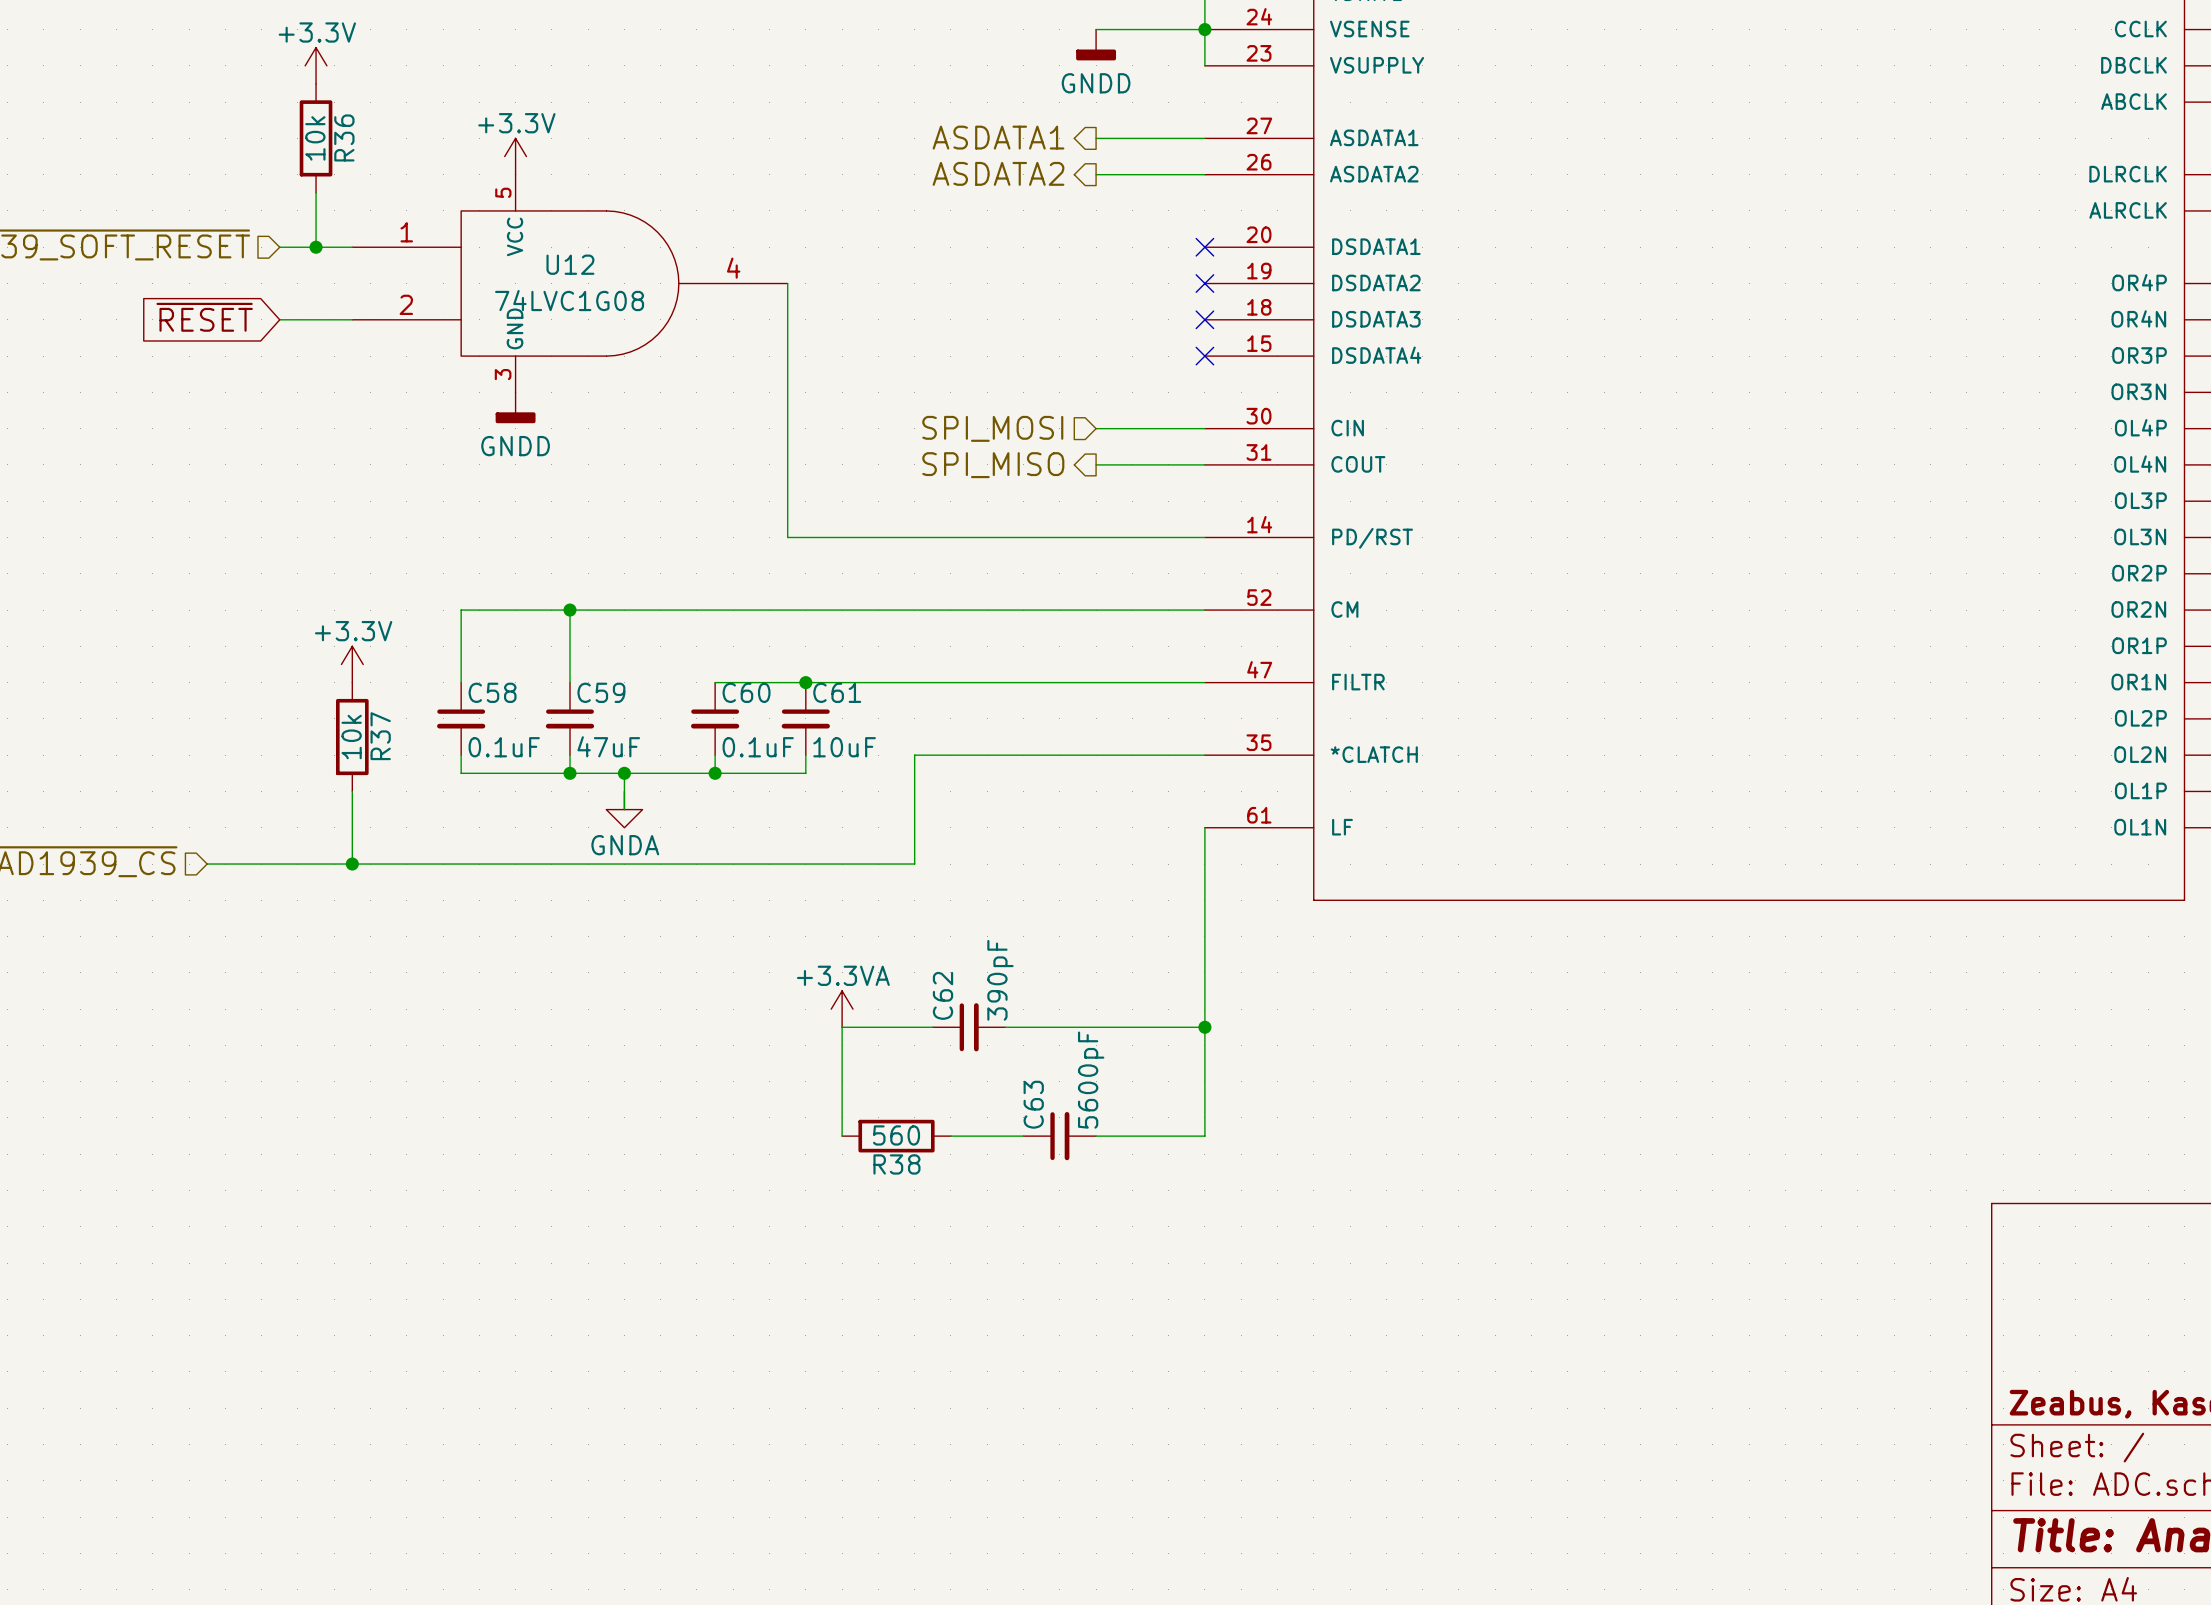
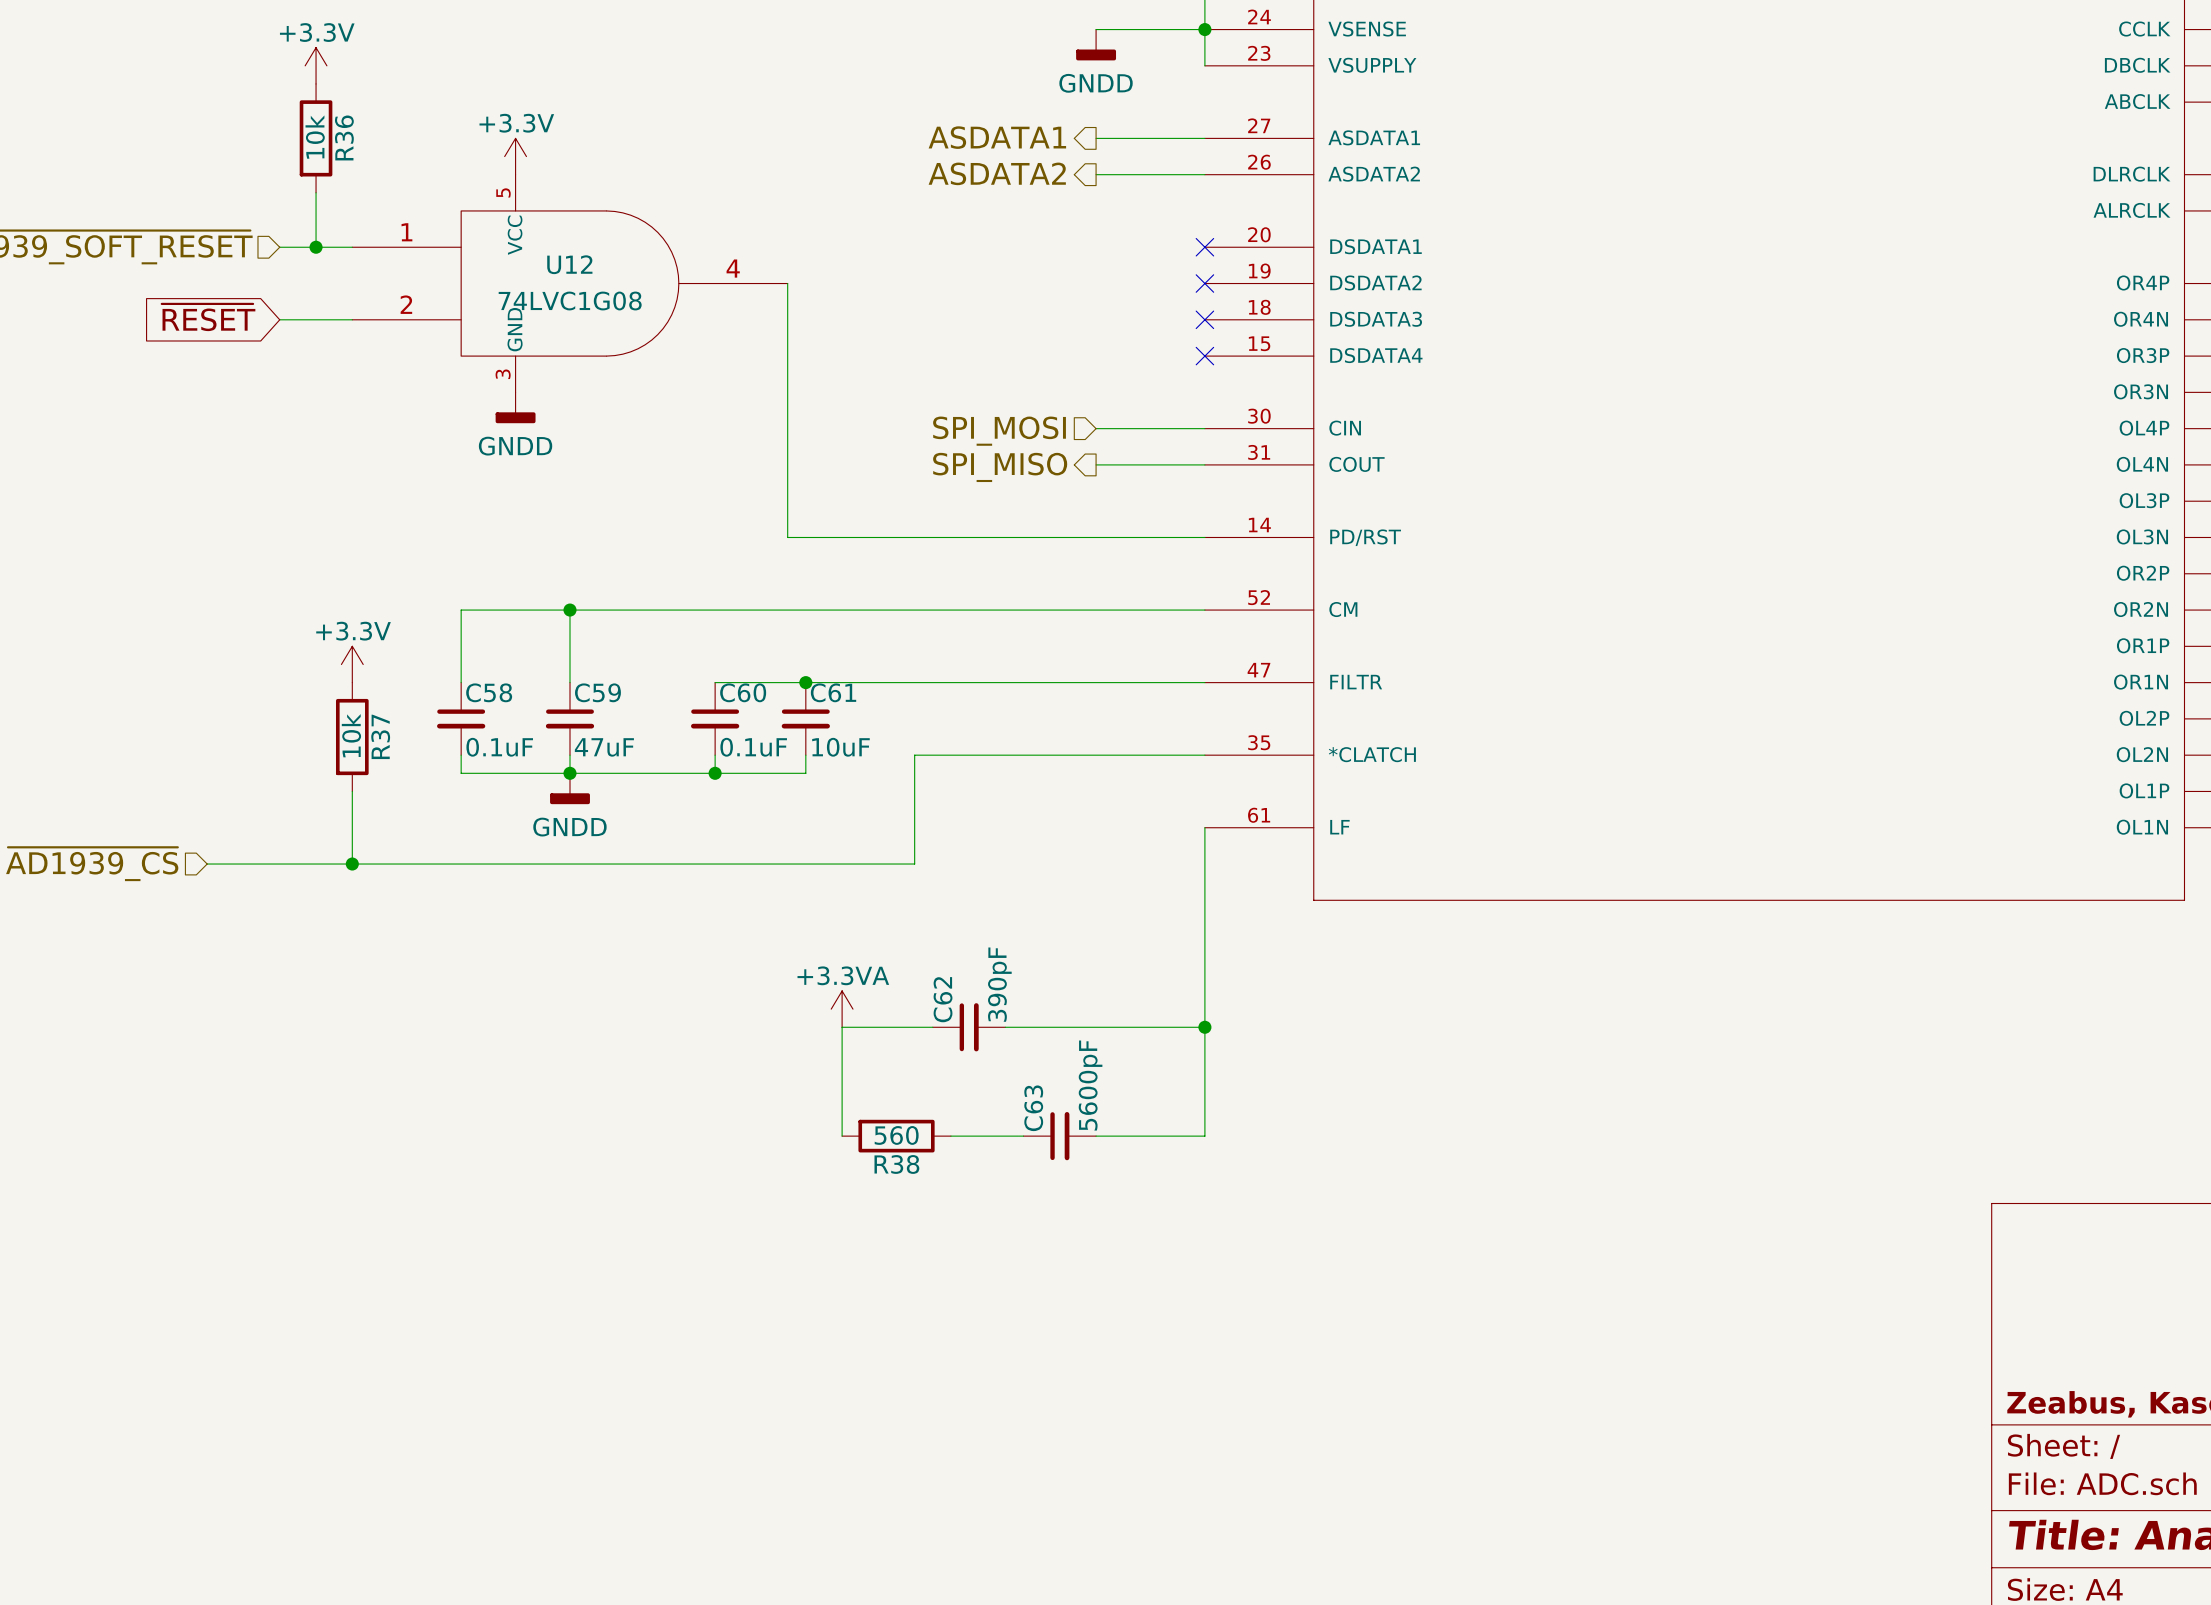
wire: (624, 773) (624, 809) -> none
junction: (624, 773) -> none
power symbol: none -> GNDD (570, 788)
power symbol: GNDA (624, 809) -> none

